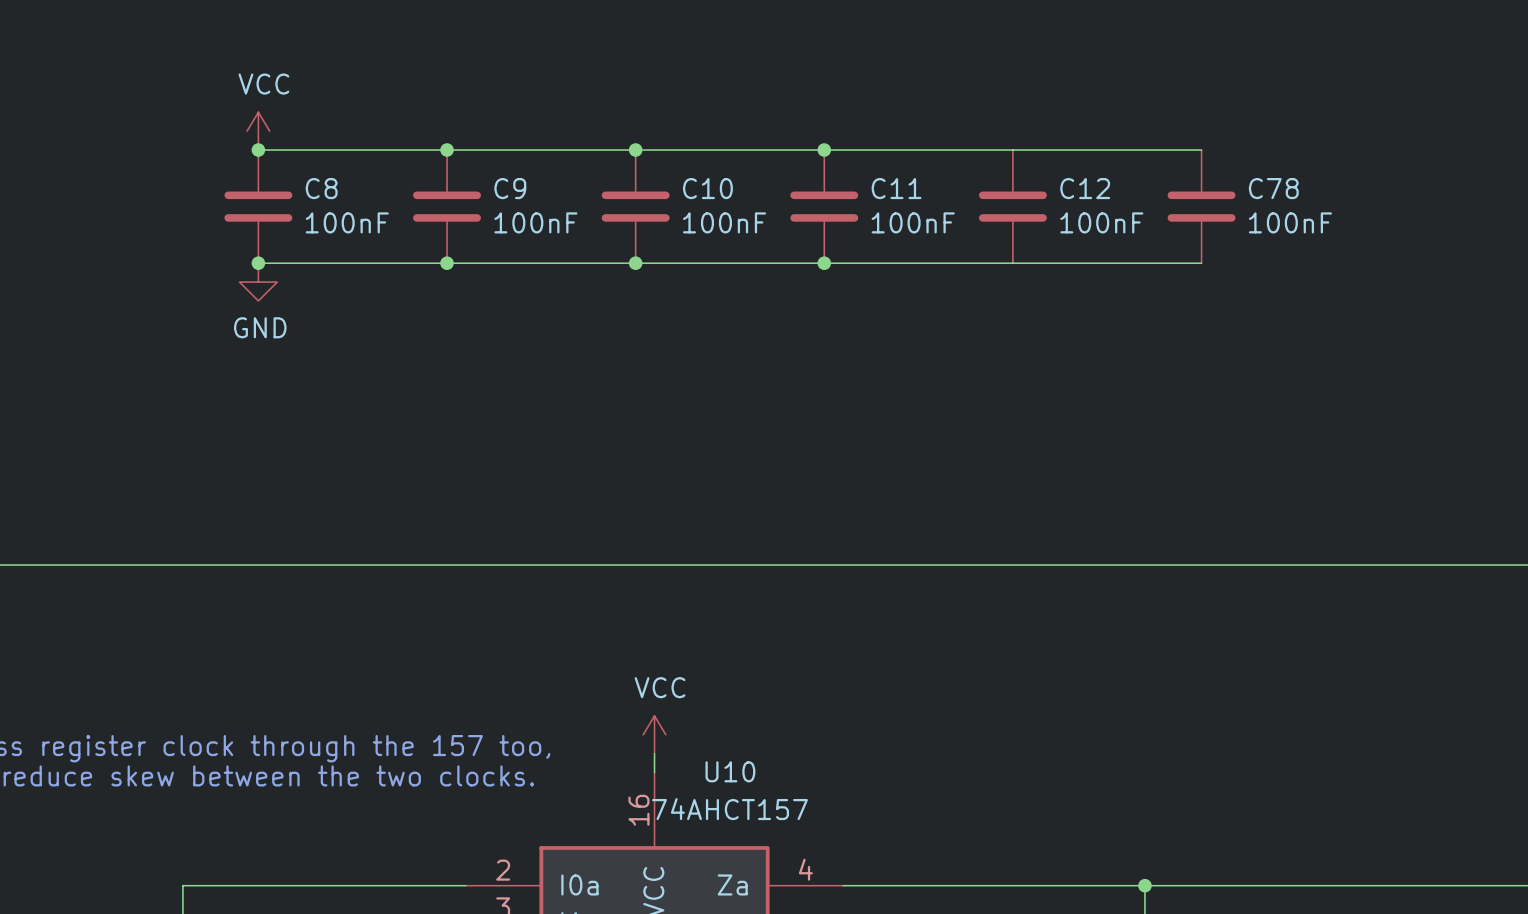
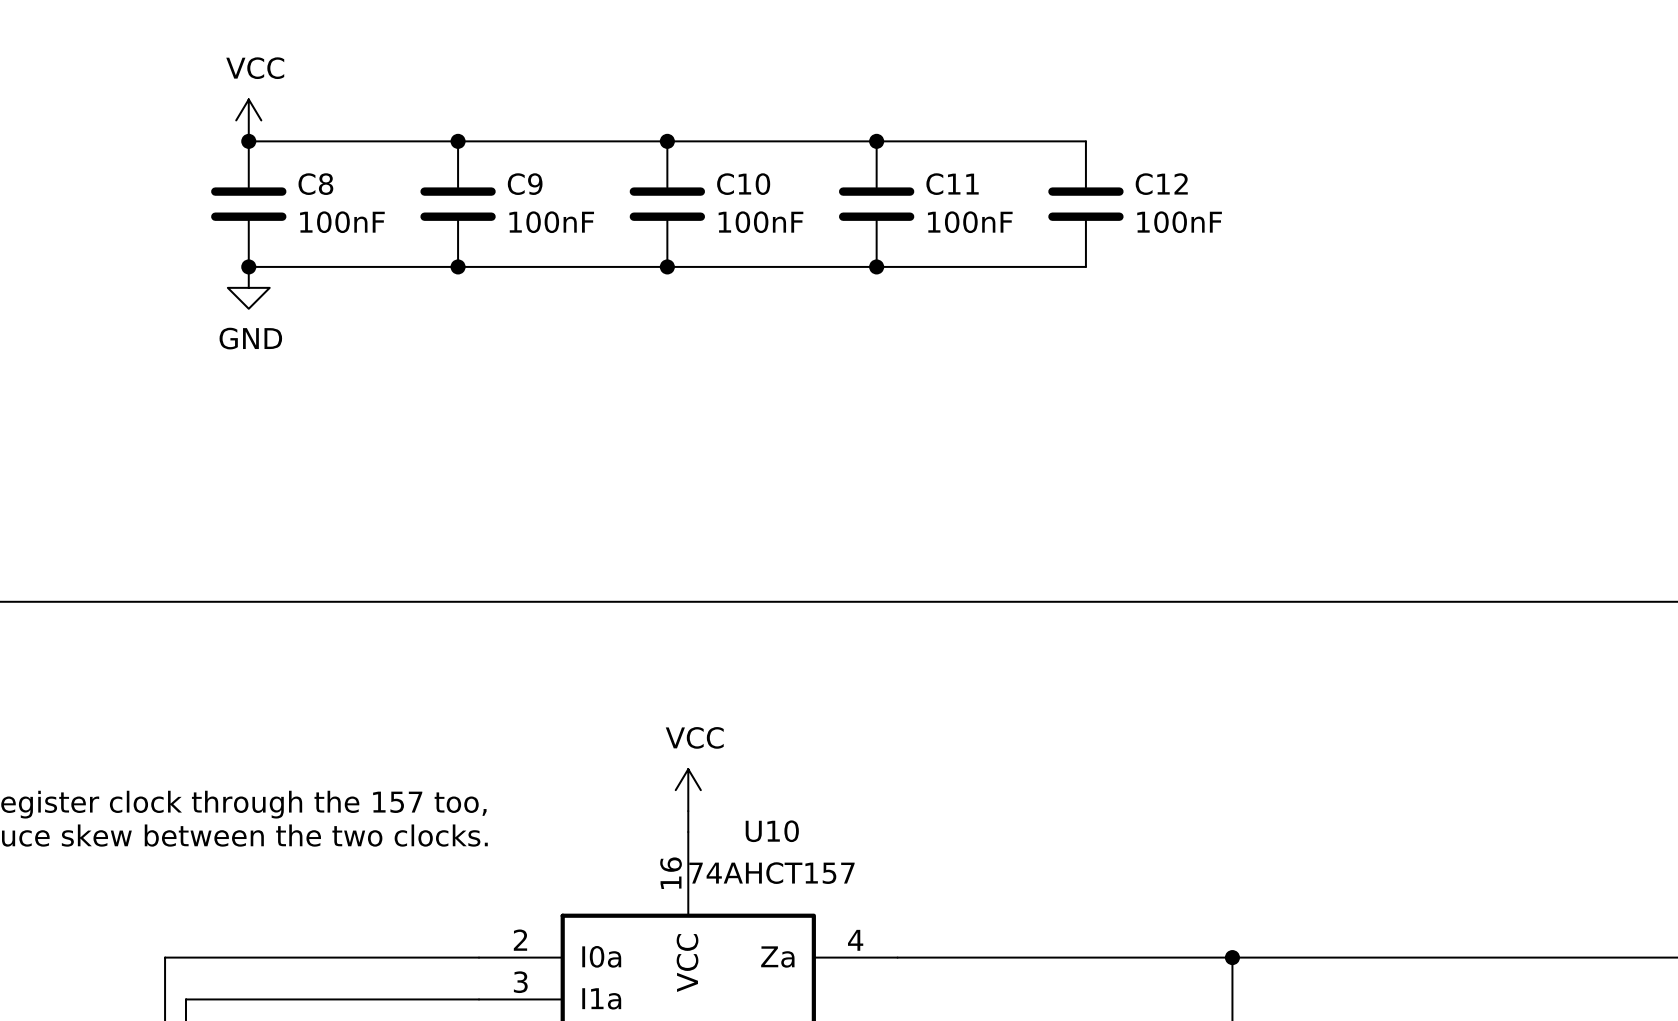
wire: (1012, 150) (1201, 150) -> none
C78: 100nF (1201, 206) -> none
wire: (1012, 263) (1201, 263) -> none

